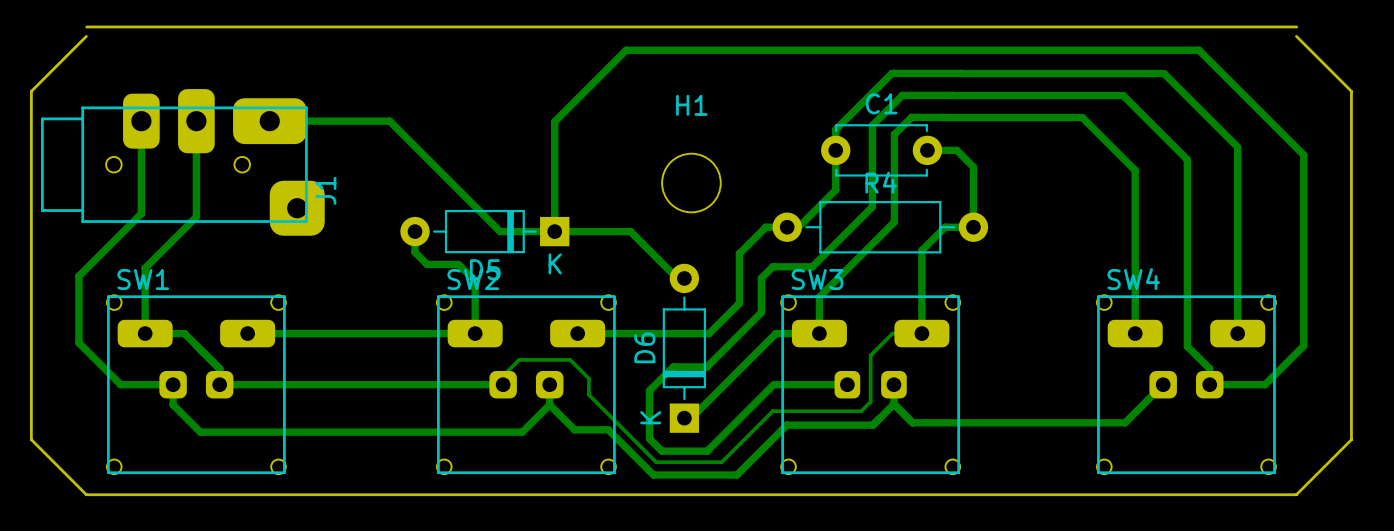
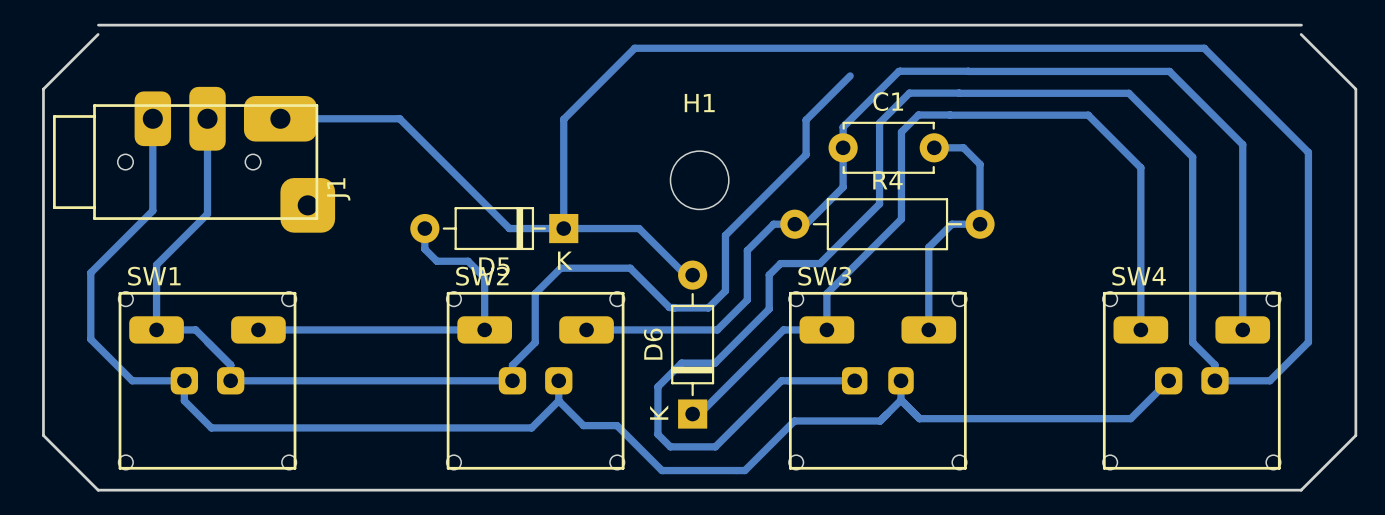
bottom track: (921, 333) (892, 333) (870, 355) (870, 401) (861, 411) (772, 411) (721, 462) (656, 462) (588, 394) (588, 378) (570, 359) (519, 359) (503, 375) -> (850, 75) (806, 120) (806, 154) (725, 235) (725, 290) (708, 307) (669, 307) (630, 268) (560, 268) (535, 293) (535, 342) (512, 365) (512, 372)

